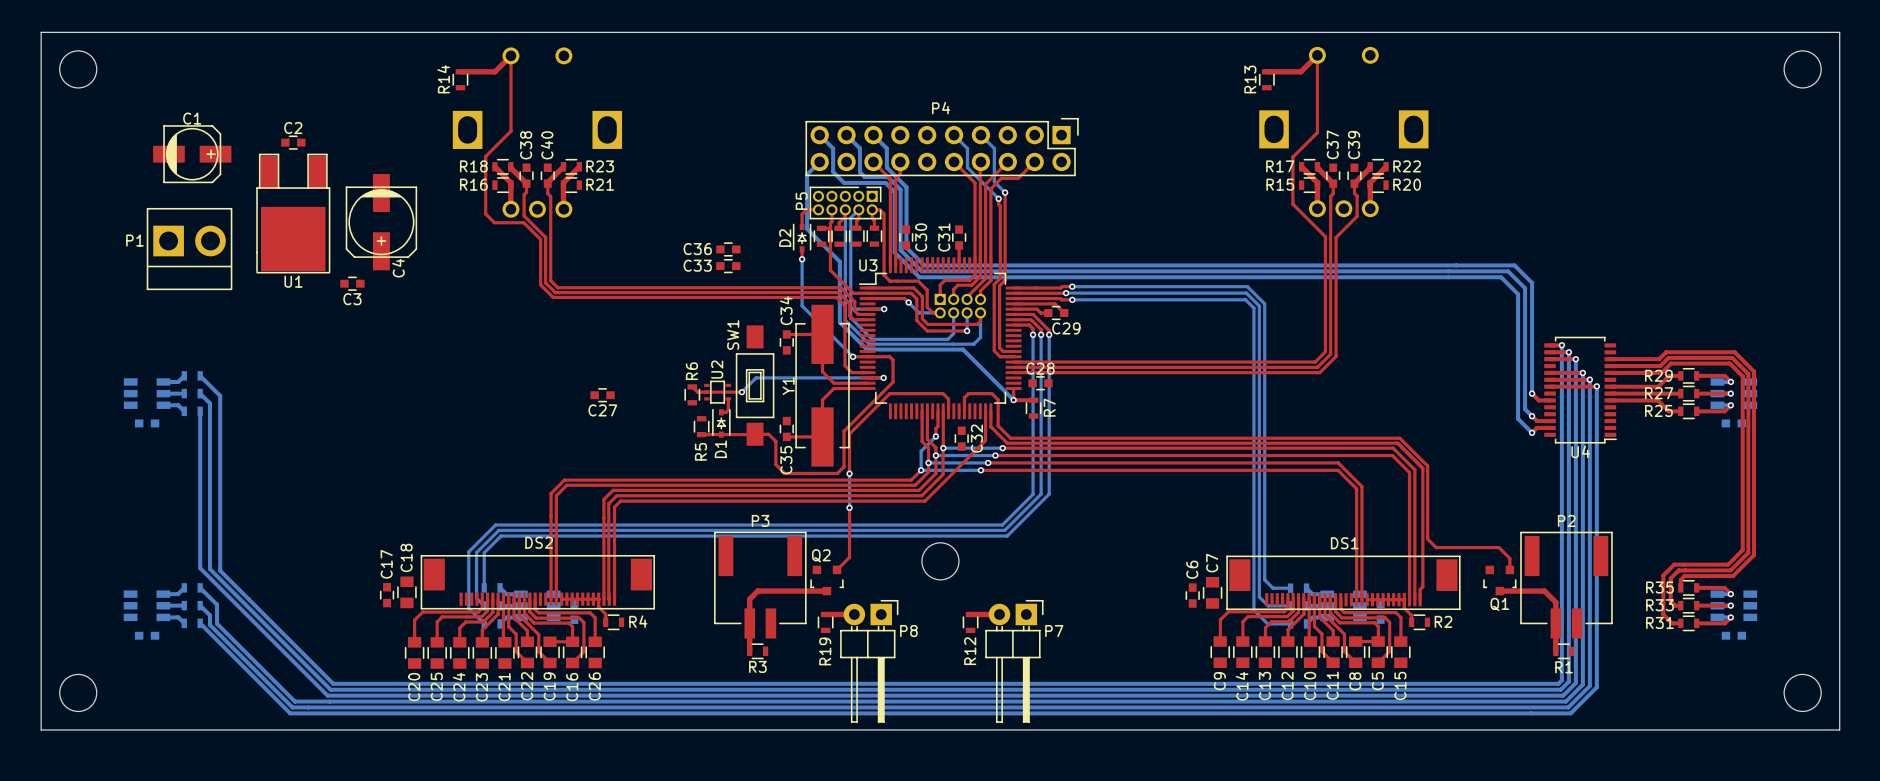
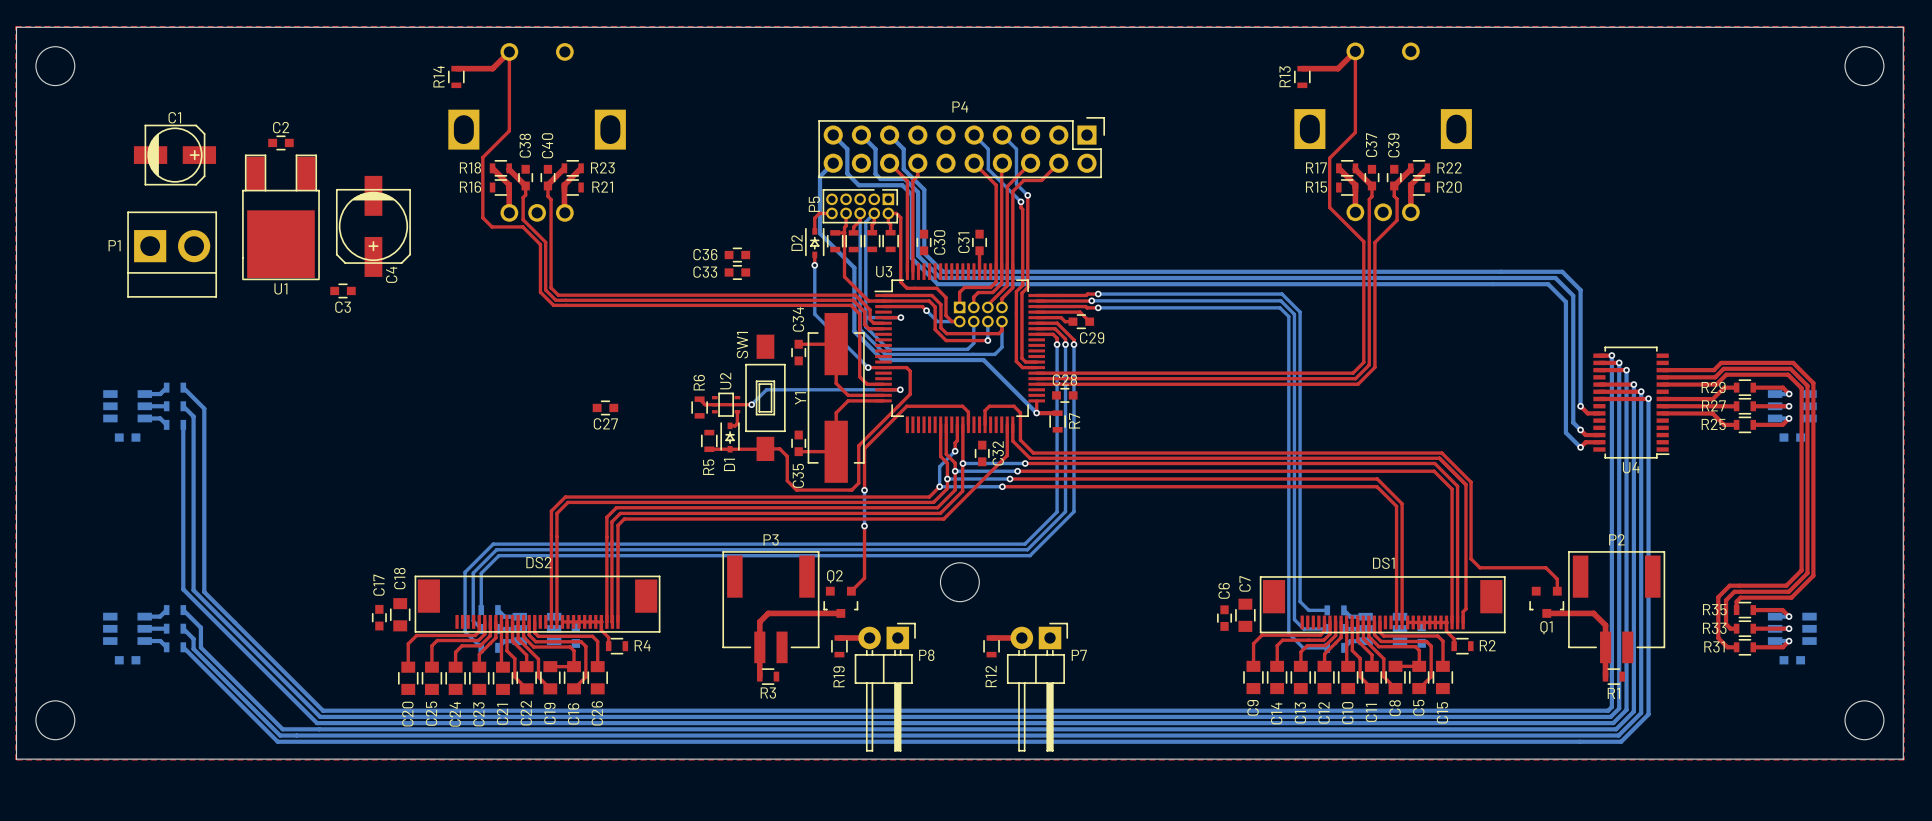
top zone outline: none -> (15, 26) (1904, 26) (1904, 760) (15, 760) (15, 26)

